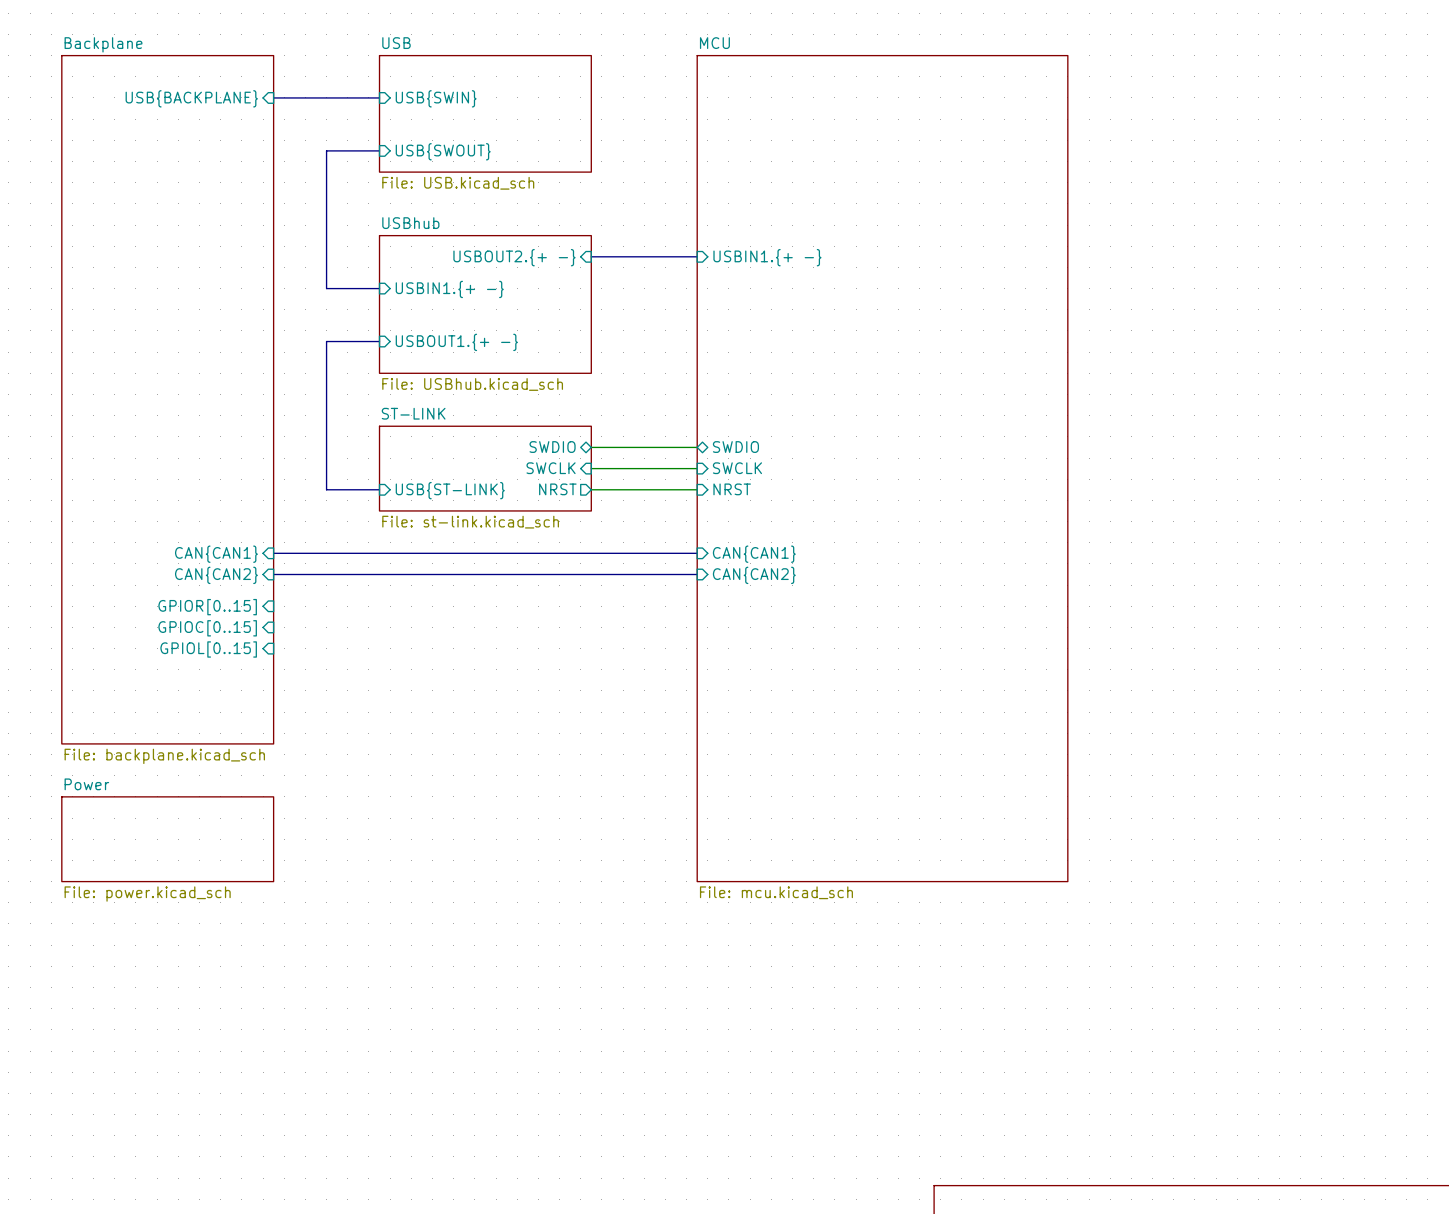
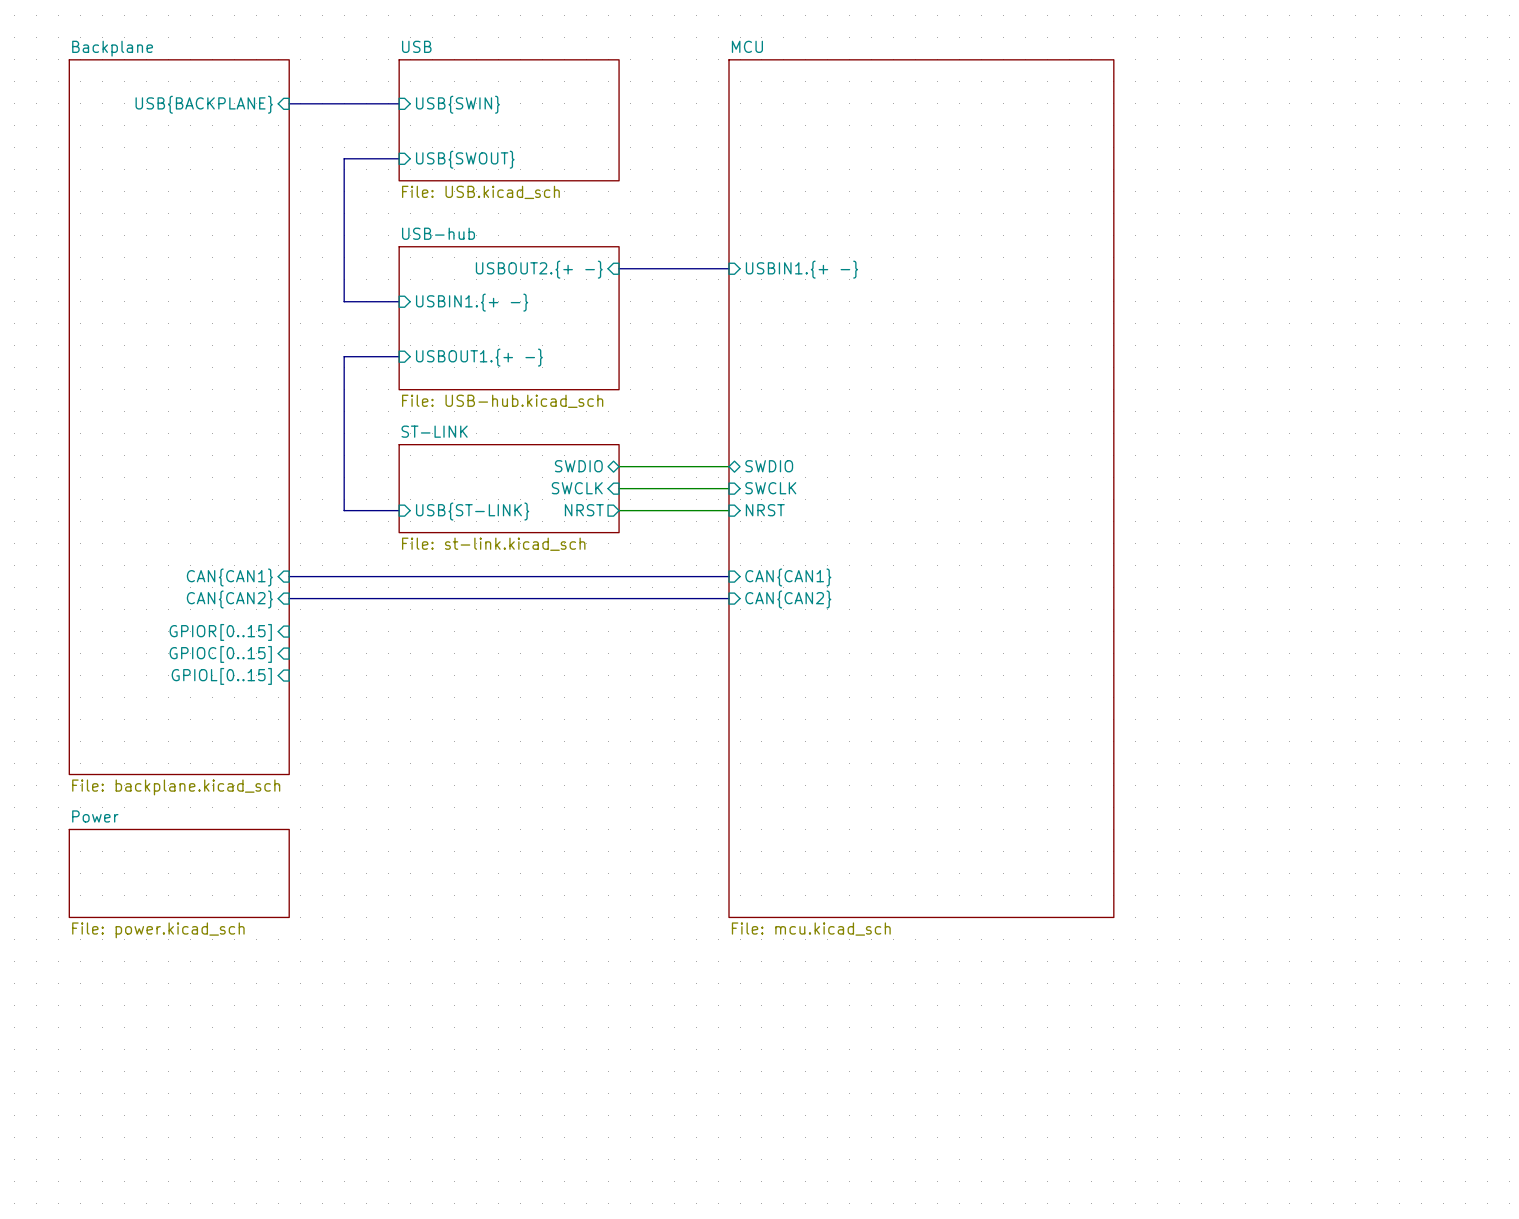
sheet USBhub name: USBhub (410, 223) -> USB-hub (438, 233)
sheet USBhub value: File: USBhub.kicad_sch (472, 384) -> File: USB-hub.kicad_sch (502, 401)

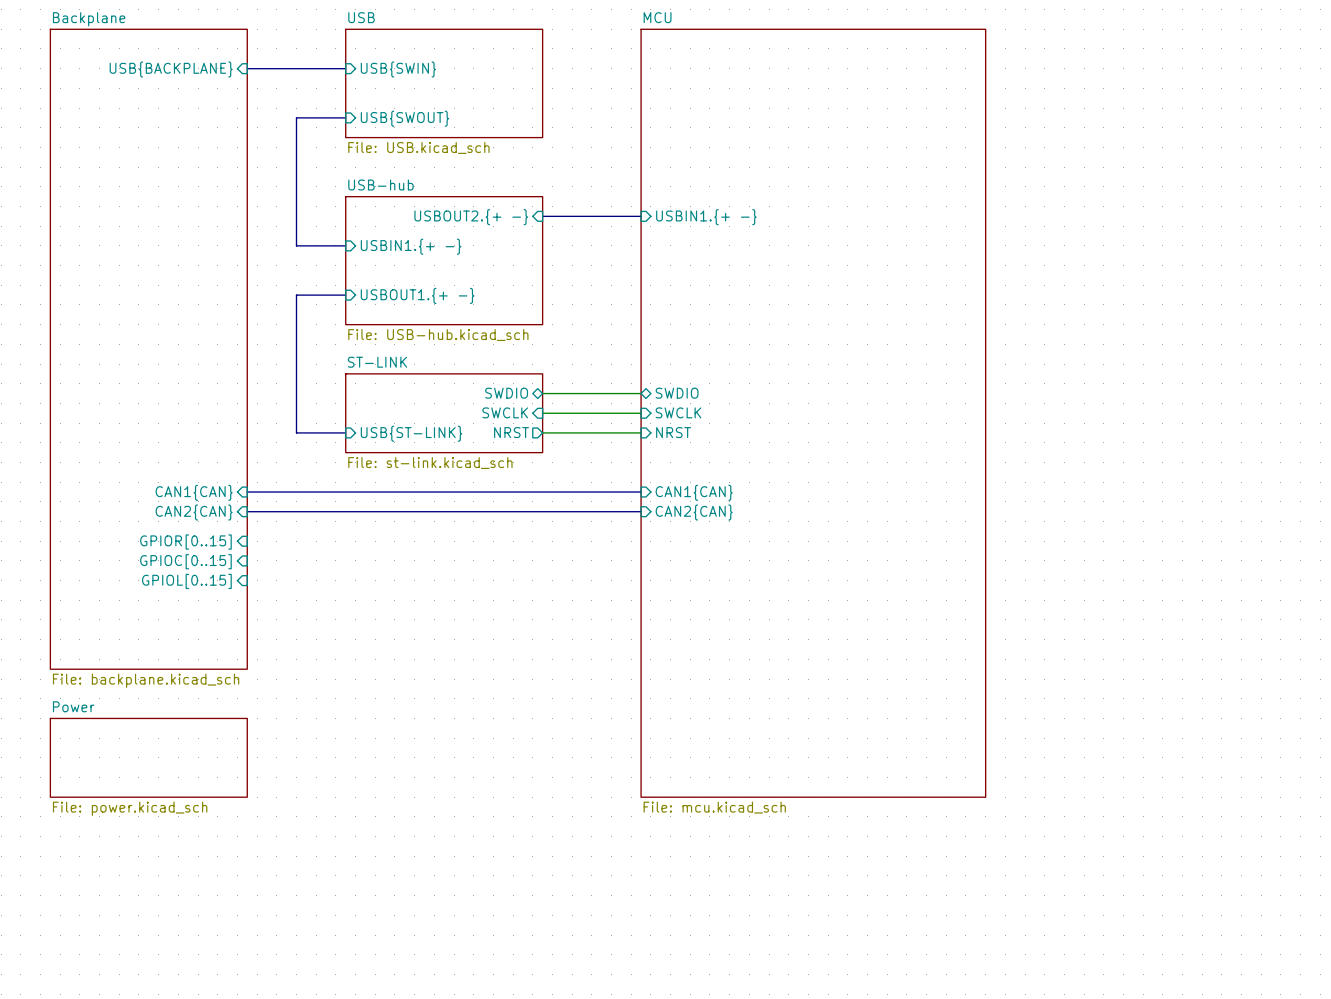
sheet pin: CAN{CAN1} (229, 577) -> CAN1{CAN} (194, 492)
sheet pin: CAN{CAN1} (788, 577) -> CAN1{CAN} (694, 492)
sheet pin: CAN{CAN2} (229, 599) -> CAN2{CAN} (194, 512)
sheet pin: CAN{CAN2} (788, 599) -> CAN2{CAN} (694, 512)

